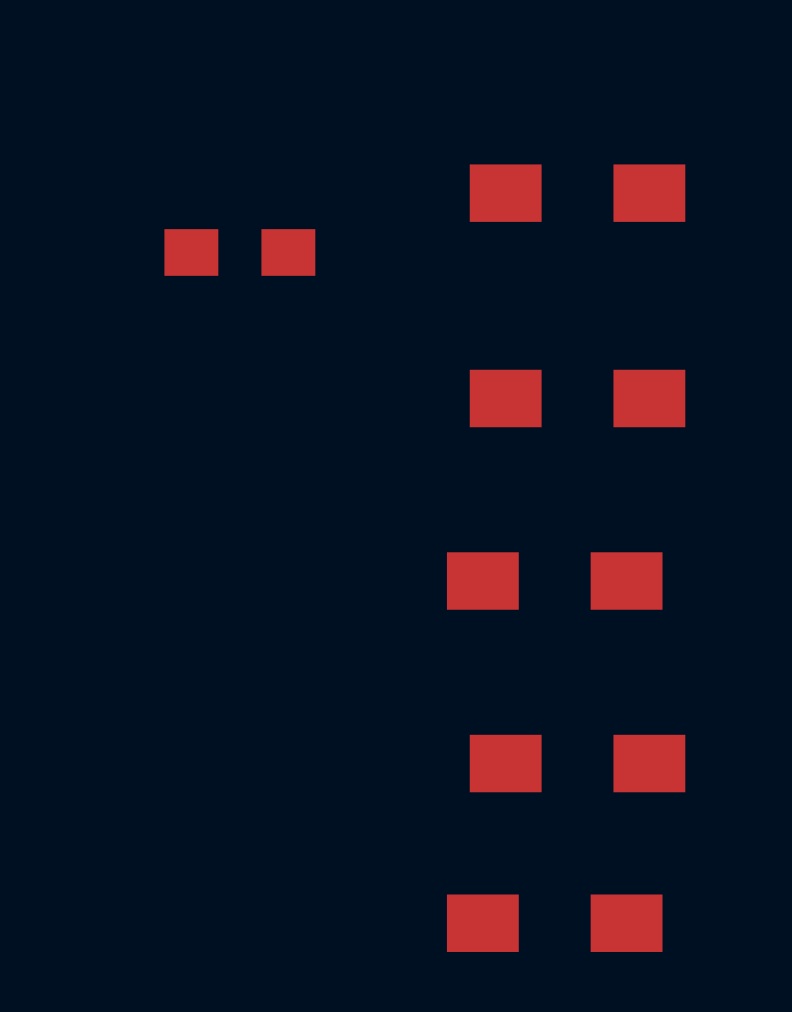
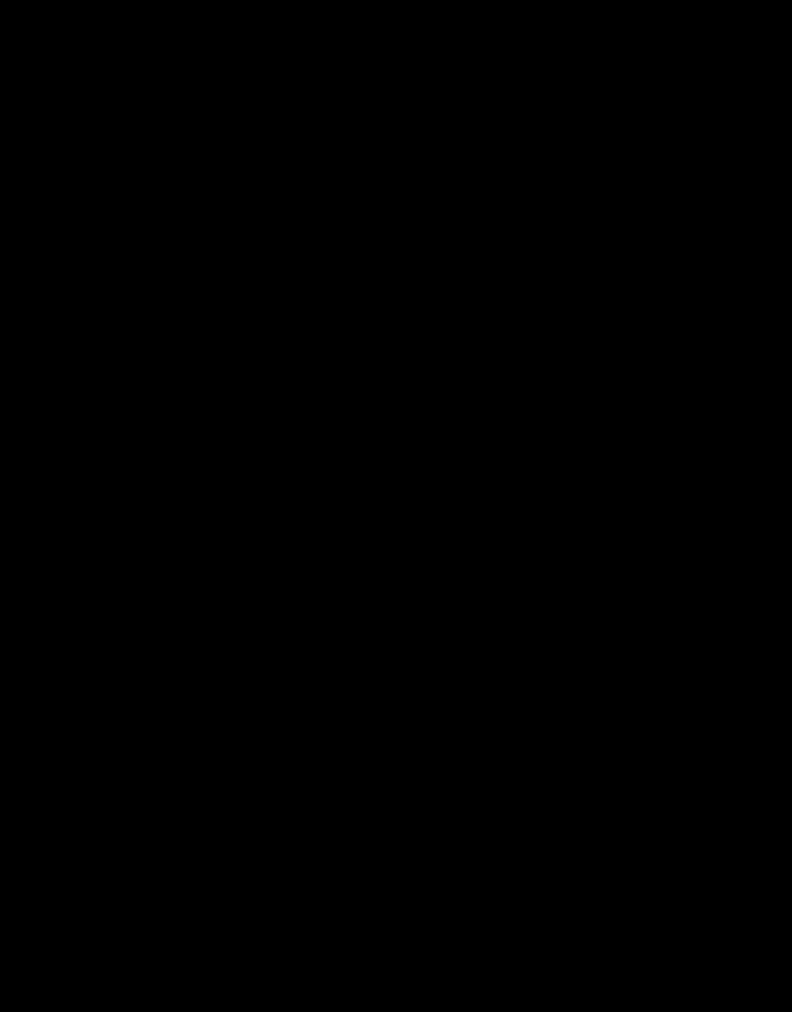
part: (577, 193) -> none
part: (239, 252) -> none
part: (577, 398) -> none
part: (554, 581) -> none
part: (577, 763) -> none
part: (554, 923) -> none

